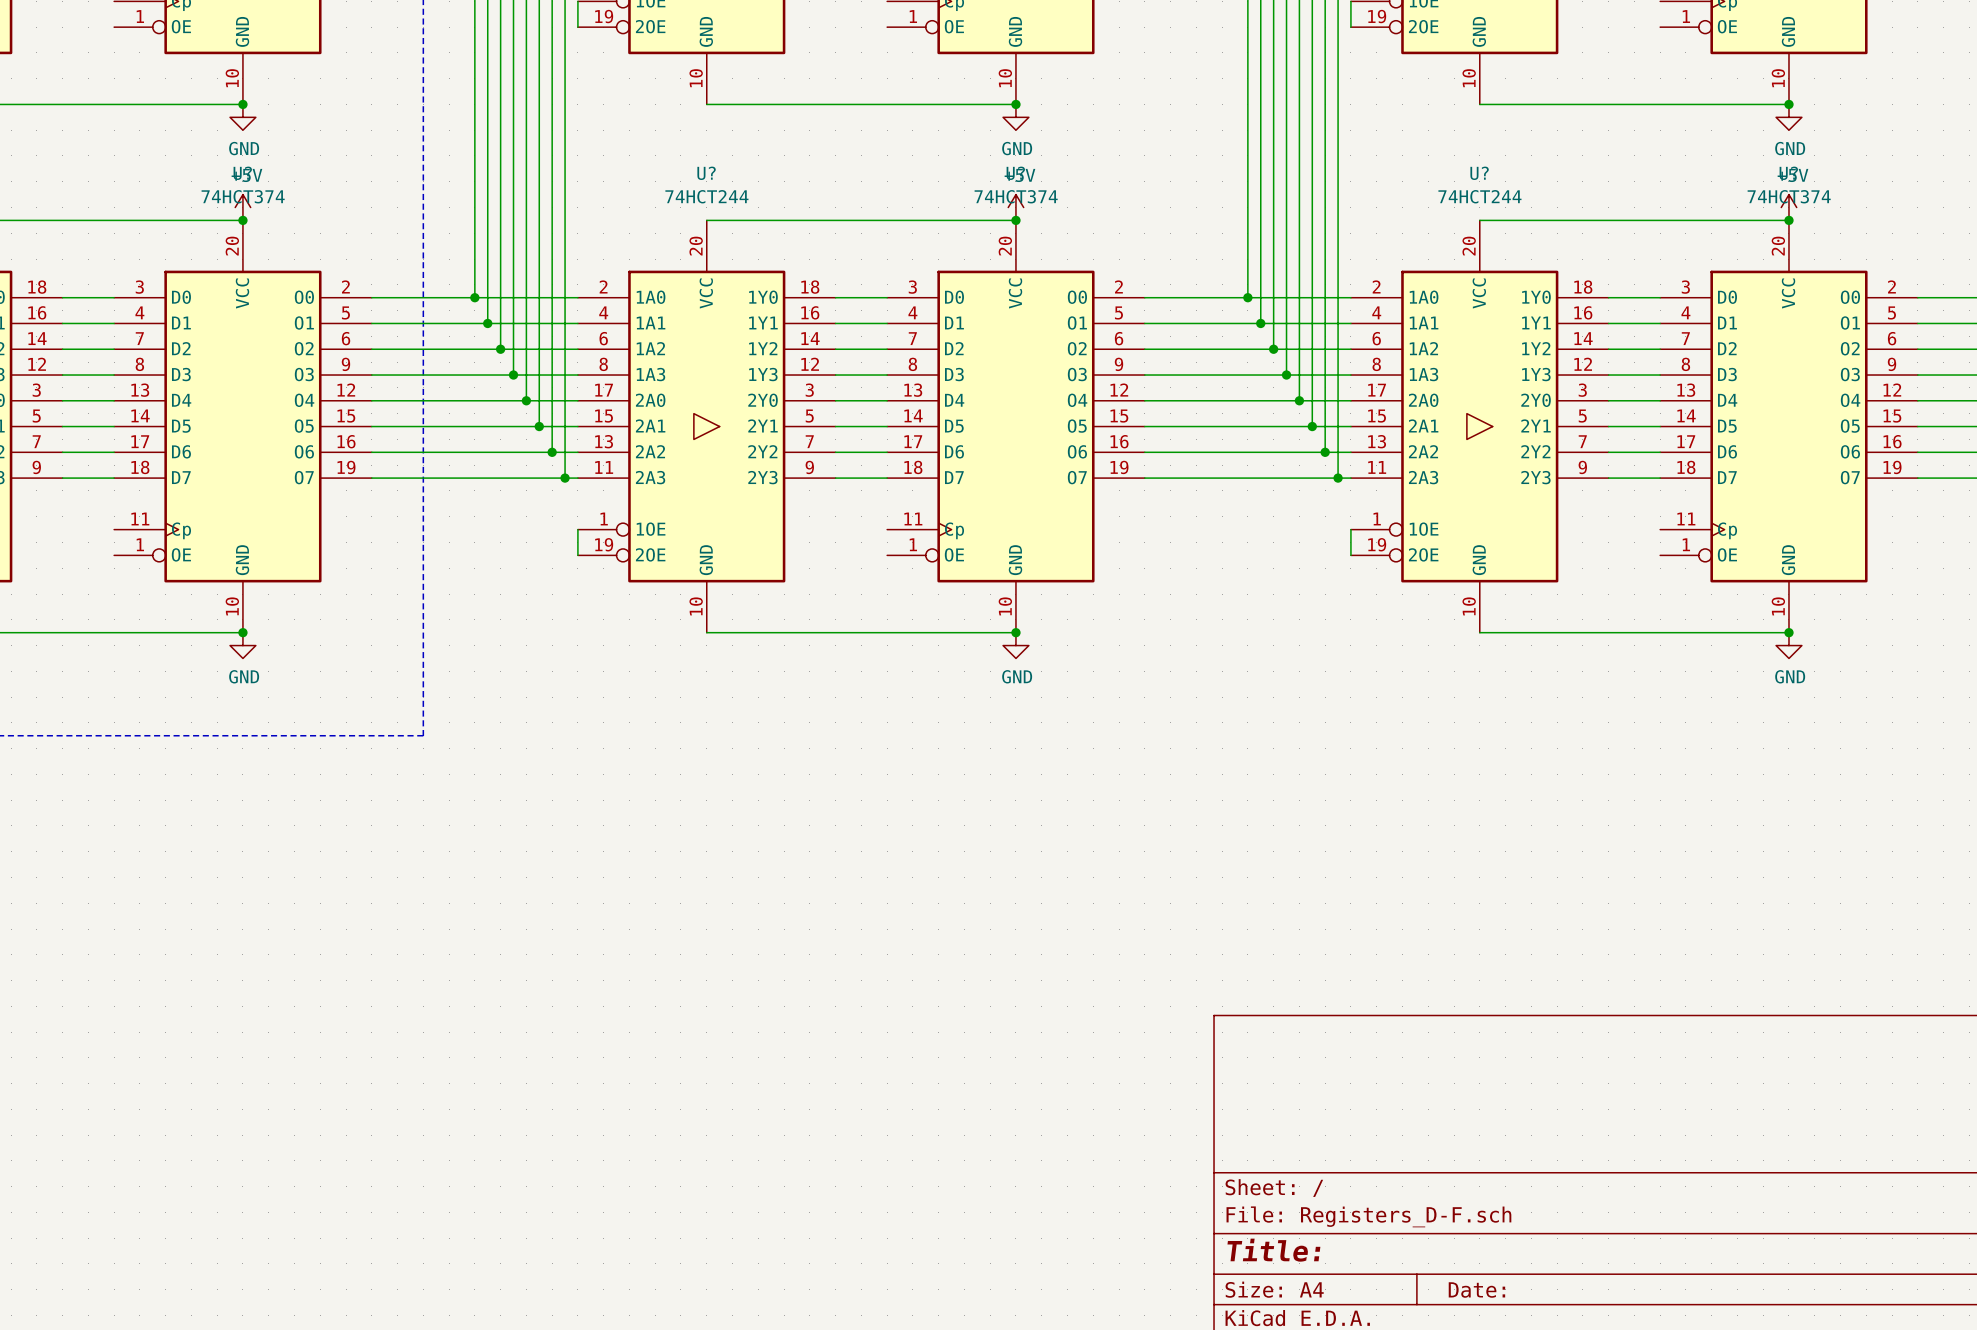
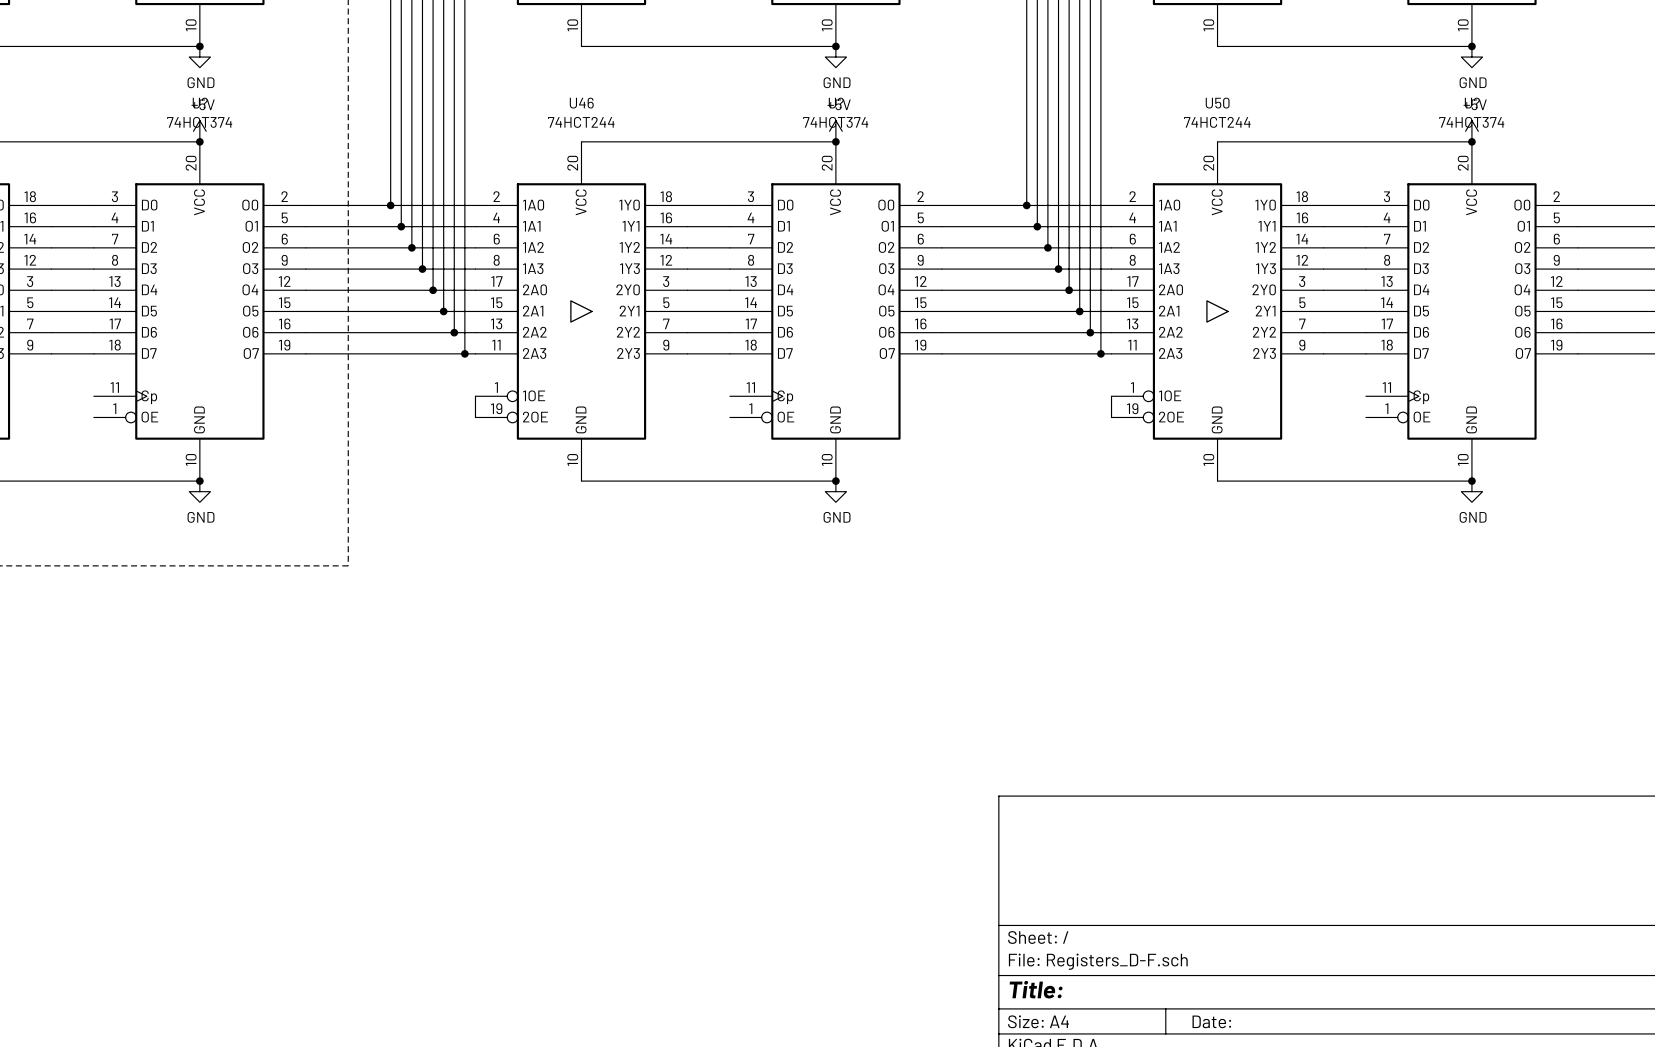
U? name: U? (706, 173) -> U46 (581, 103)
U? name: U? (1479, 173) -> U50 (1217, 103)

